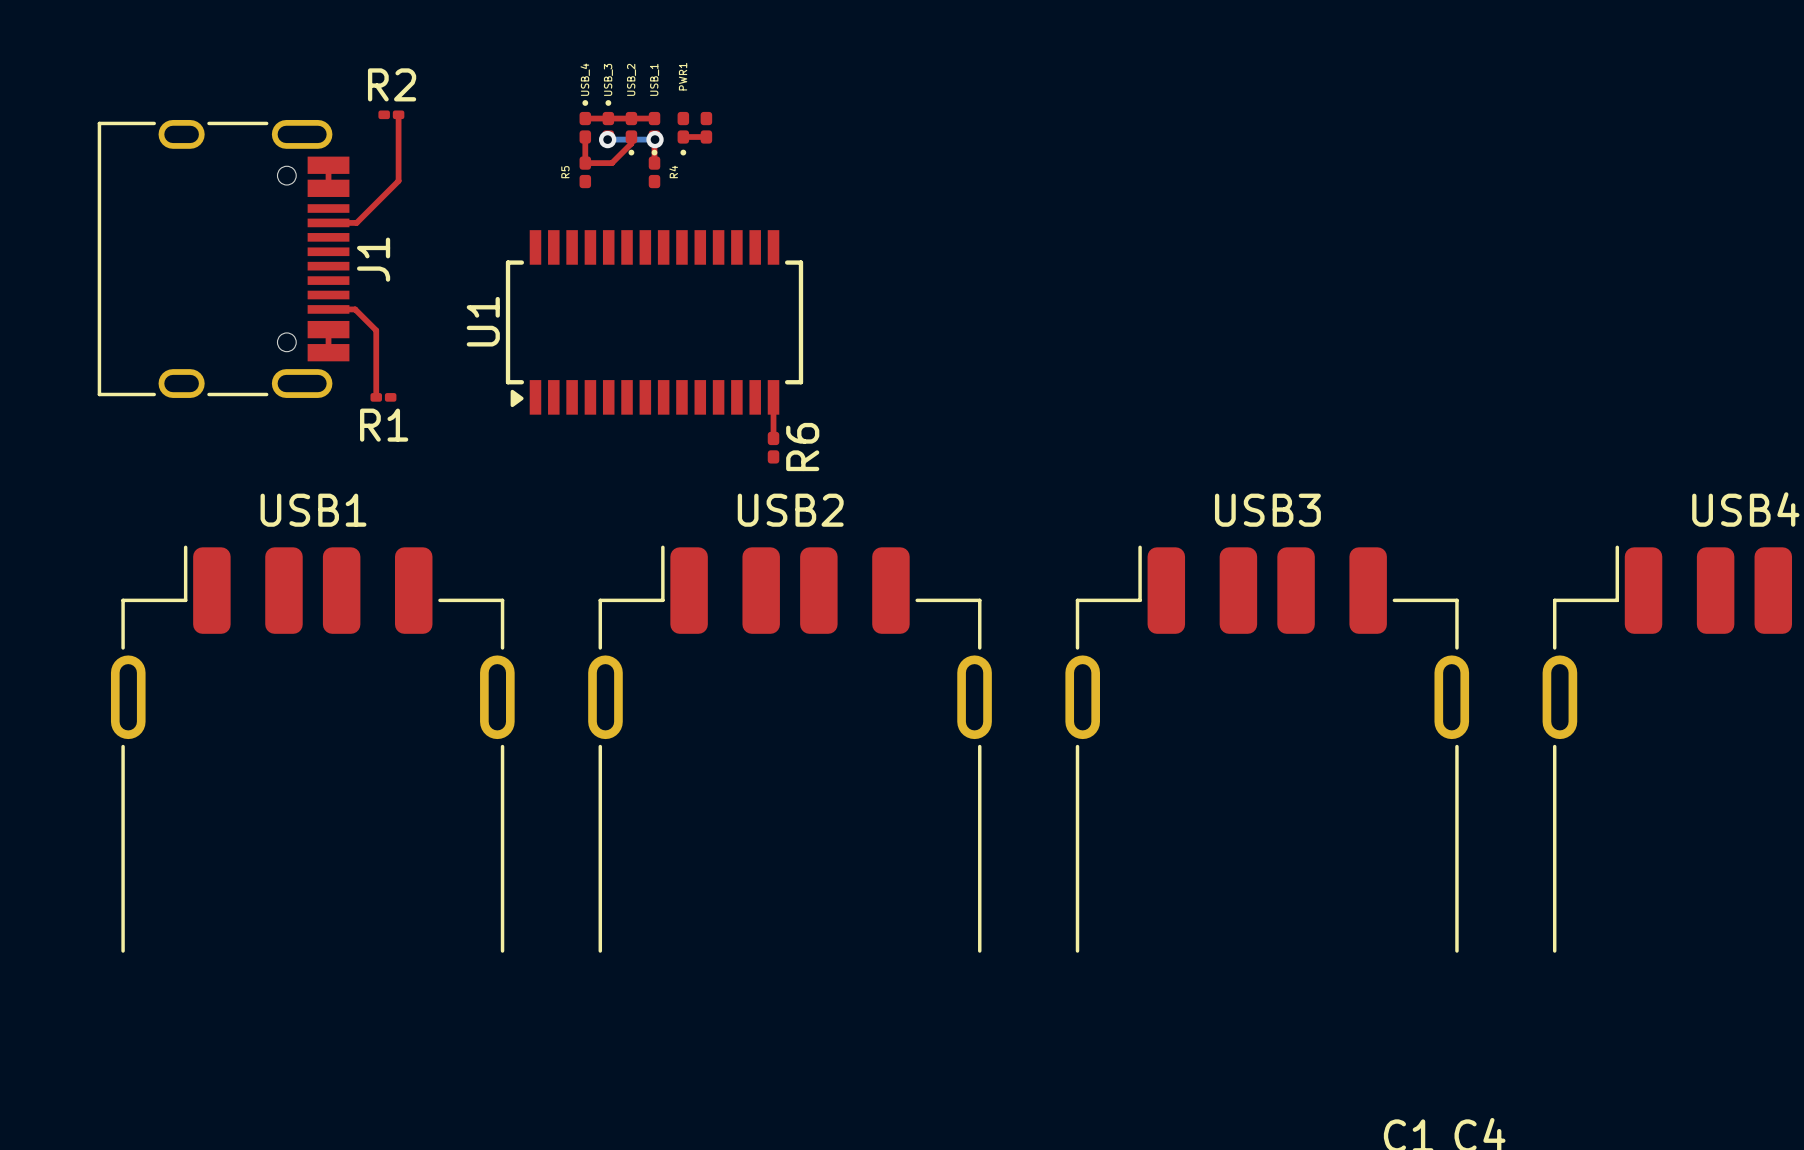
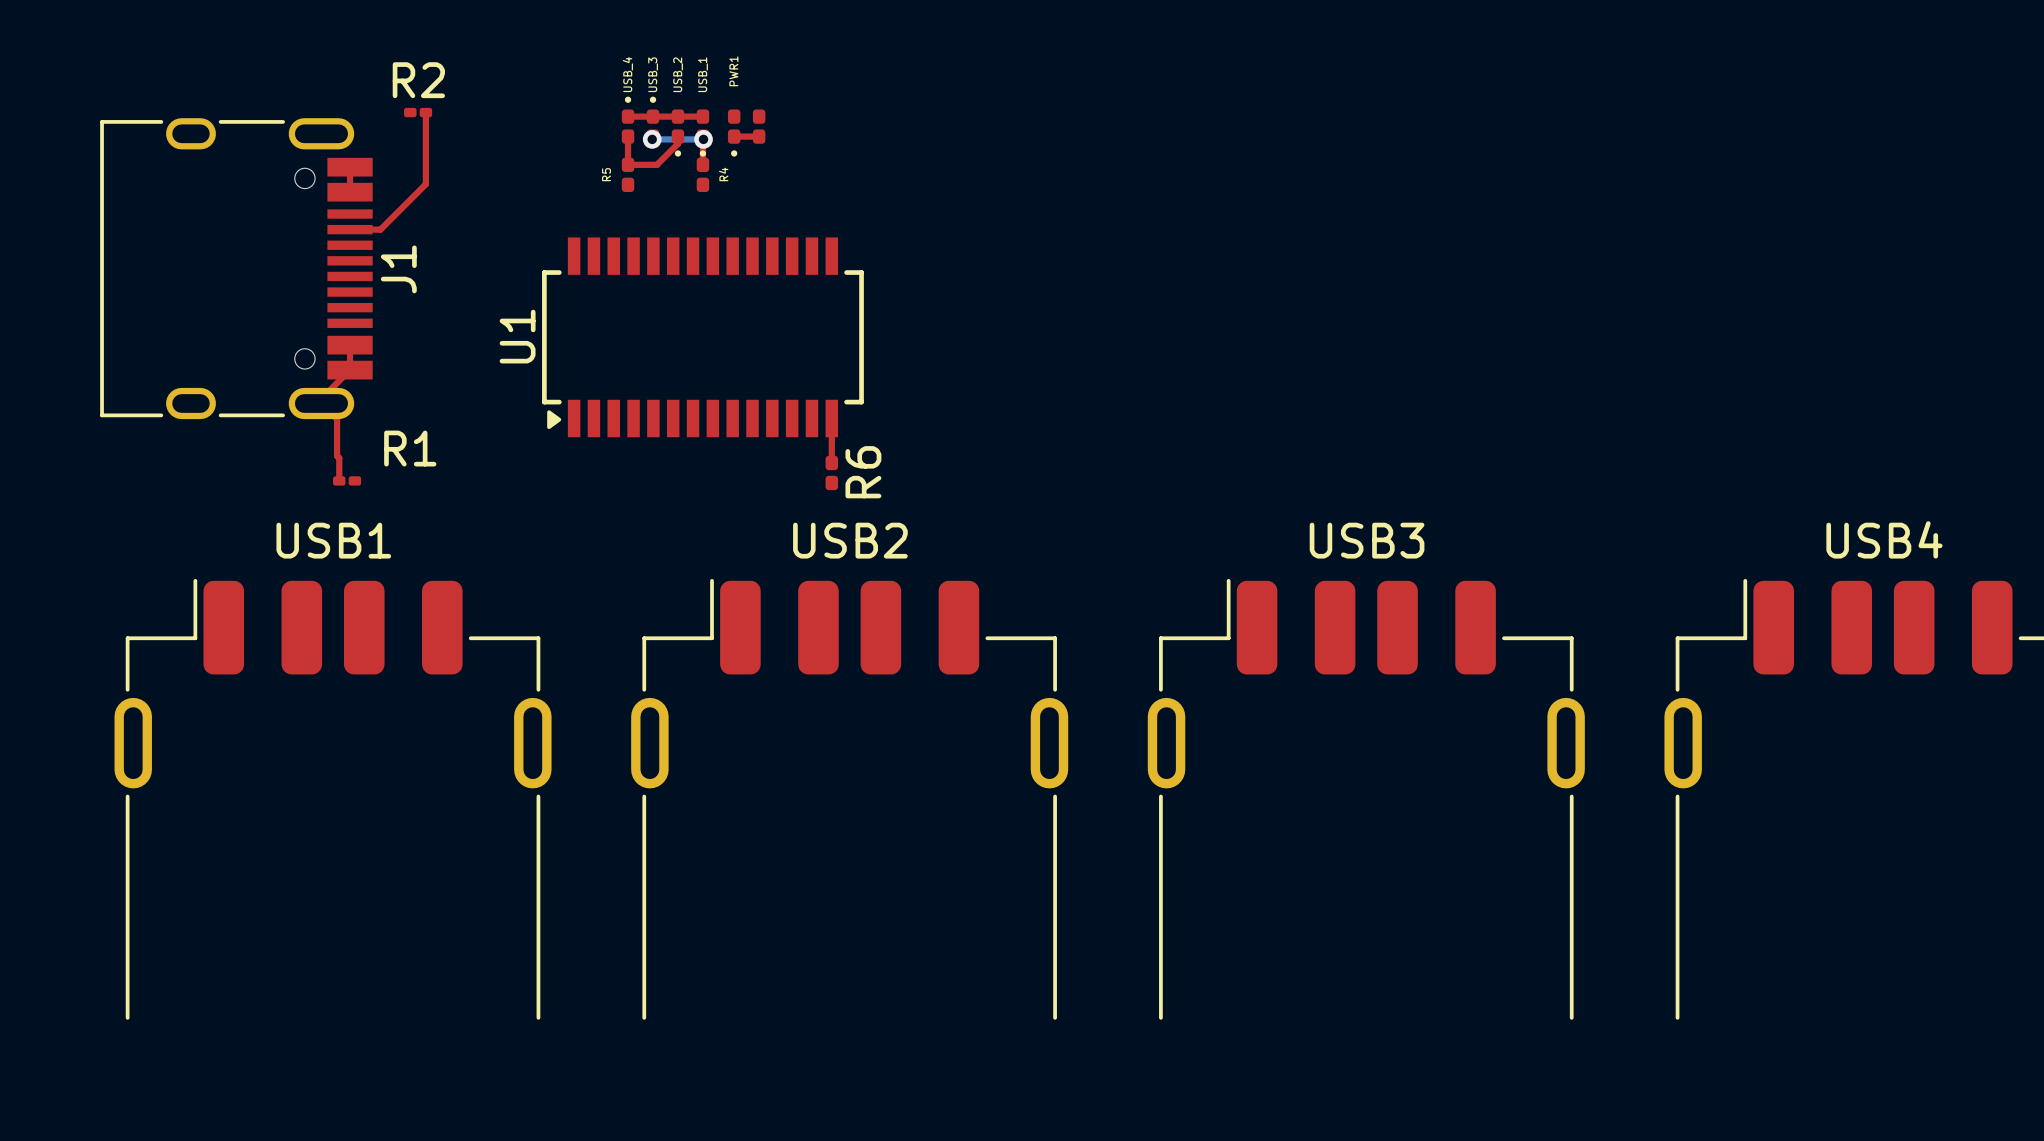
top track: (328, 309) (355, 309) (376, 330) (376, 397) -> none
top track: none -> (350, 370) (321, 398) (321, 403) (337, 419) (339, 480)
R1 position: (383, 397) -> (347, 480)

